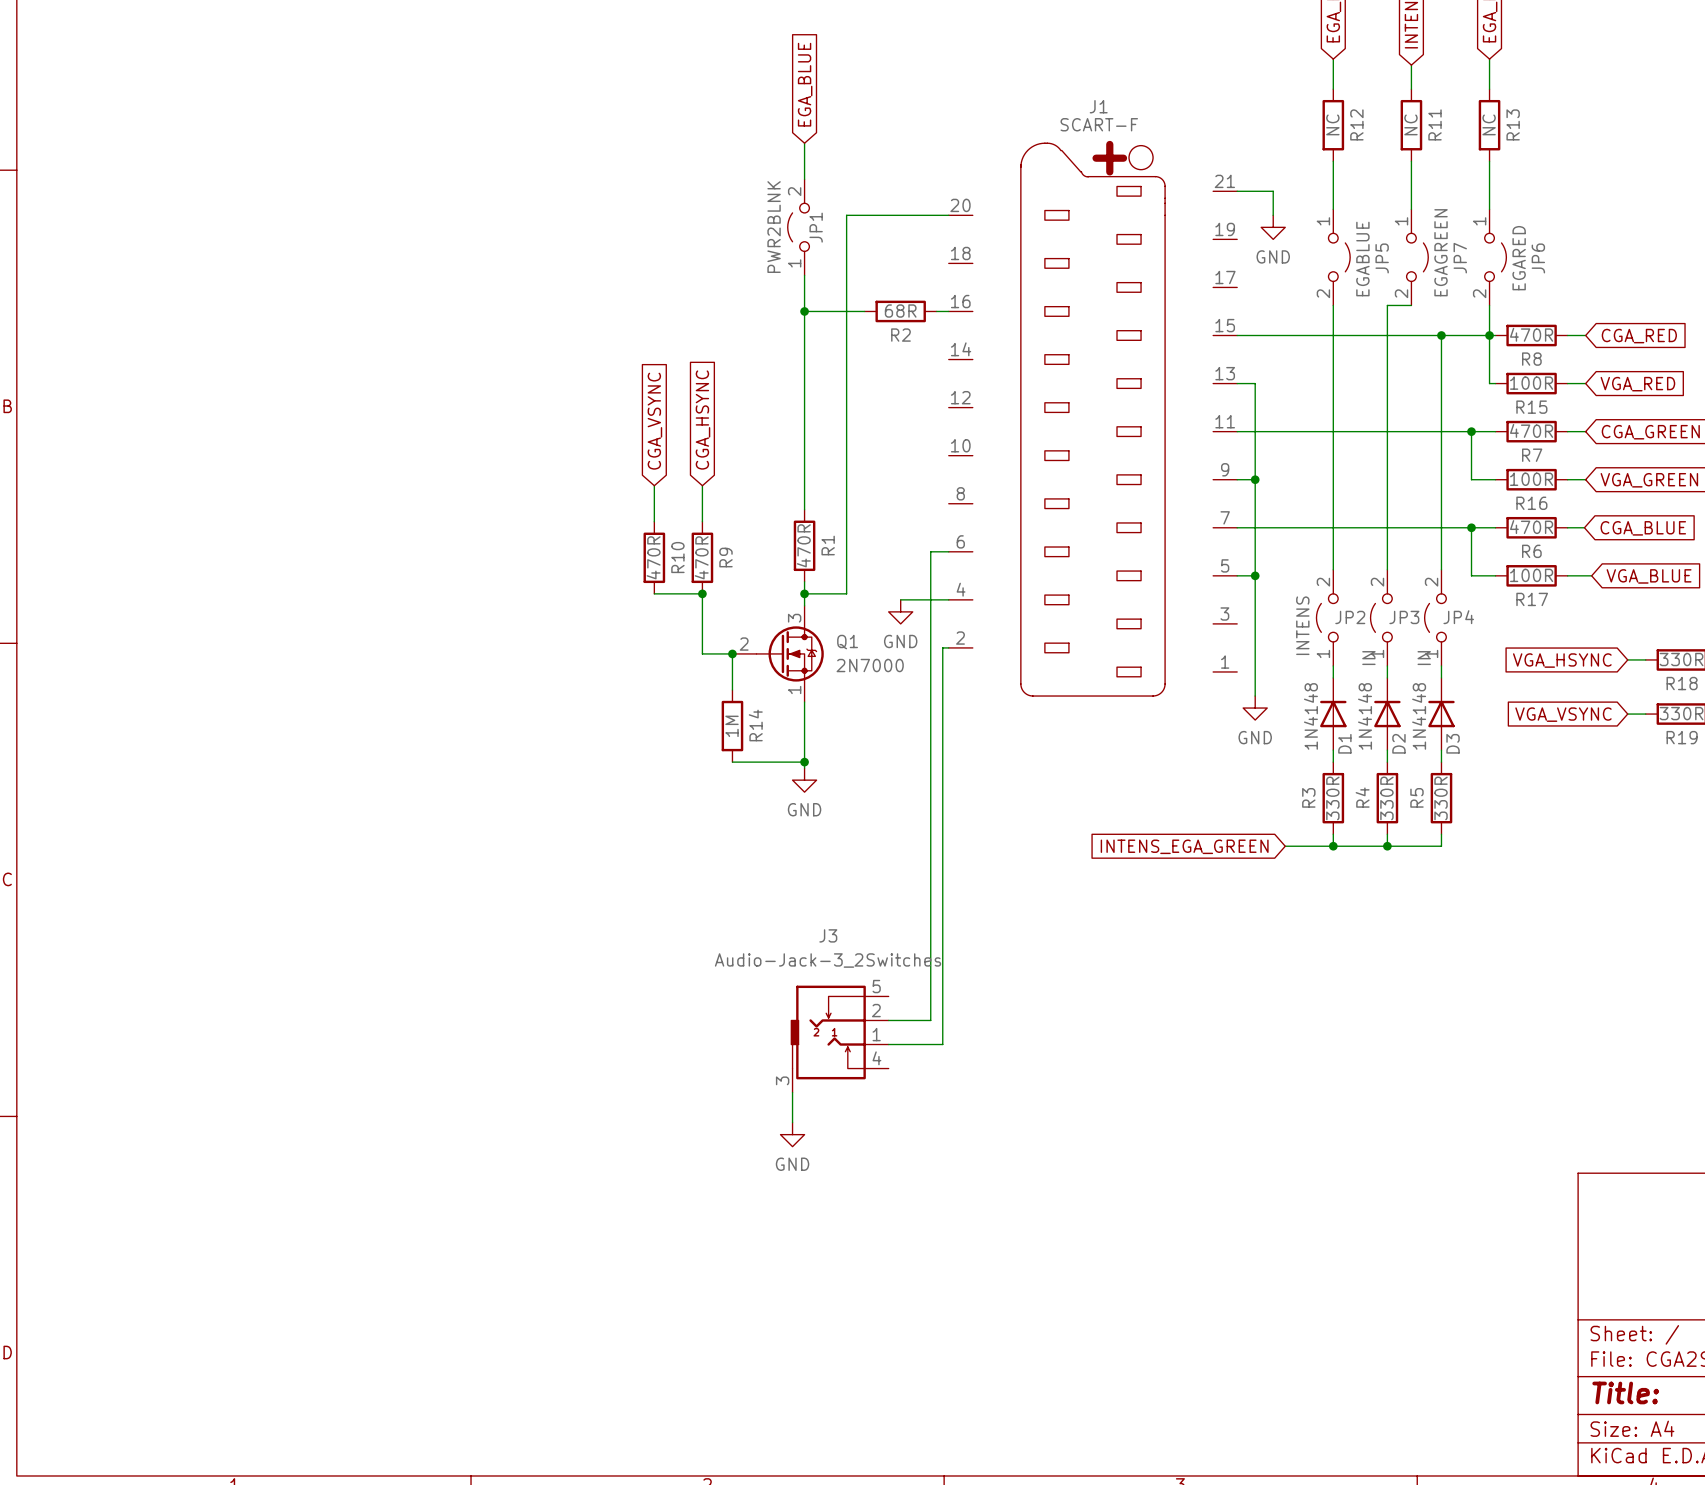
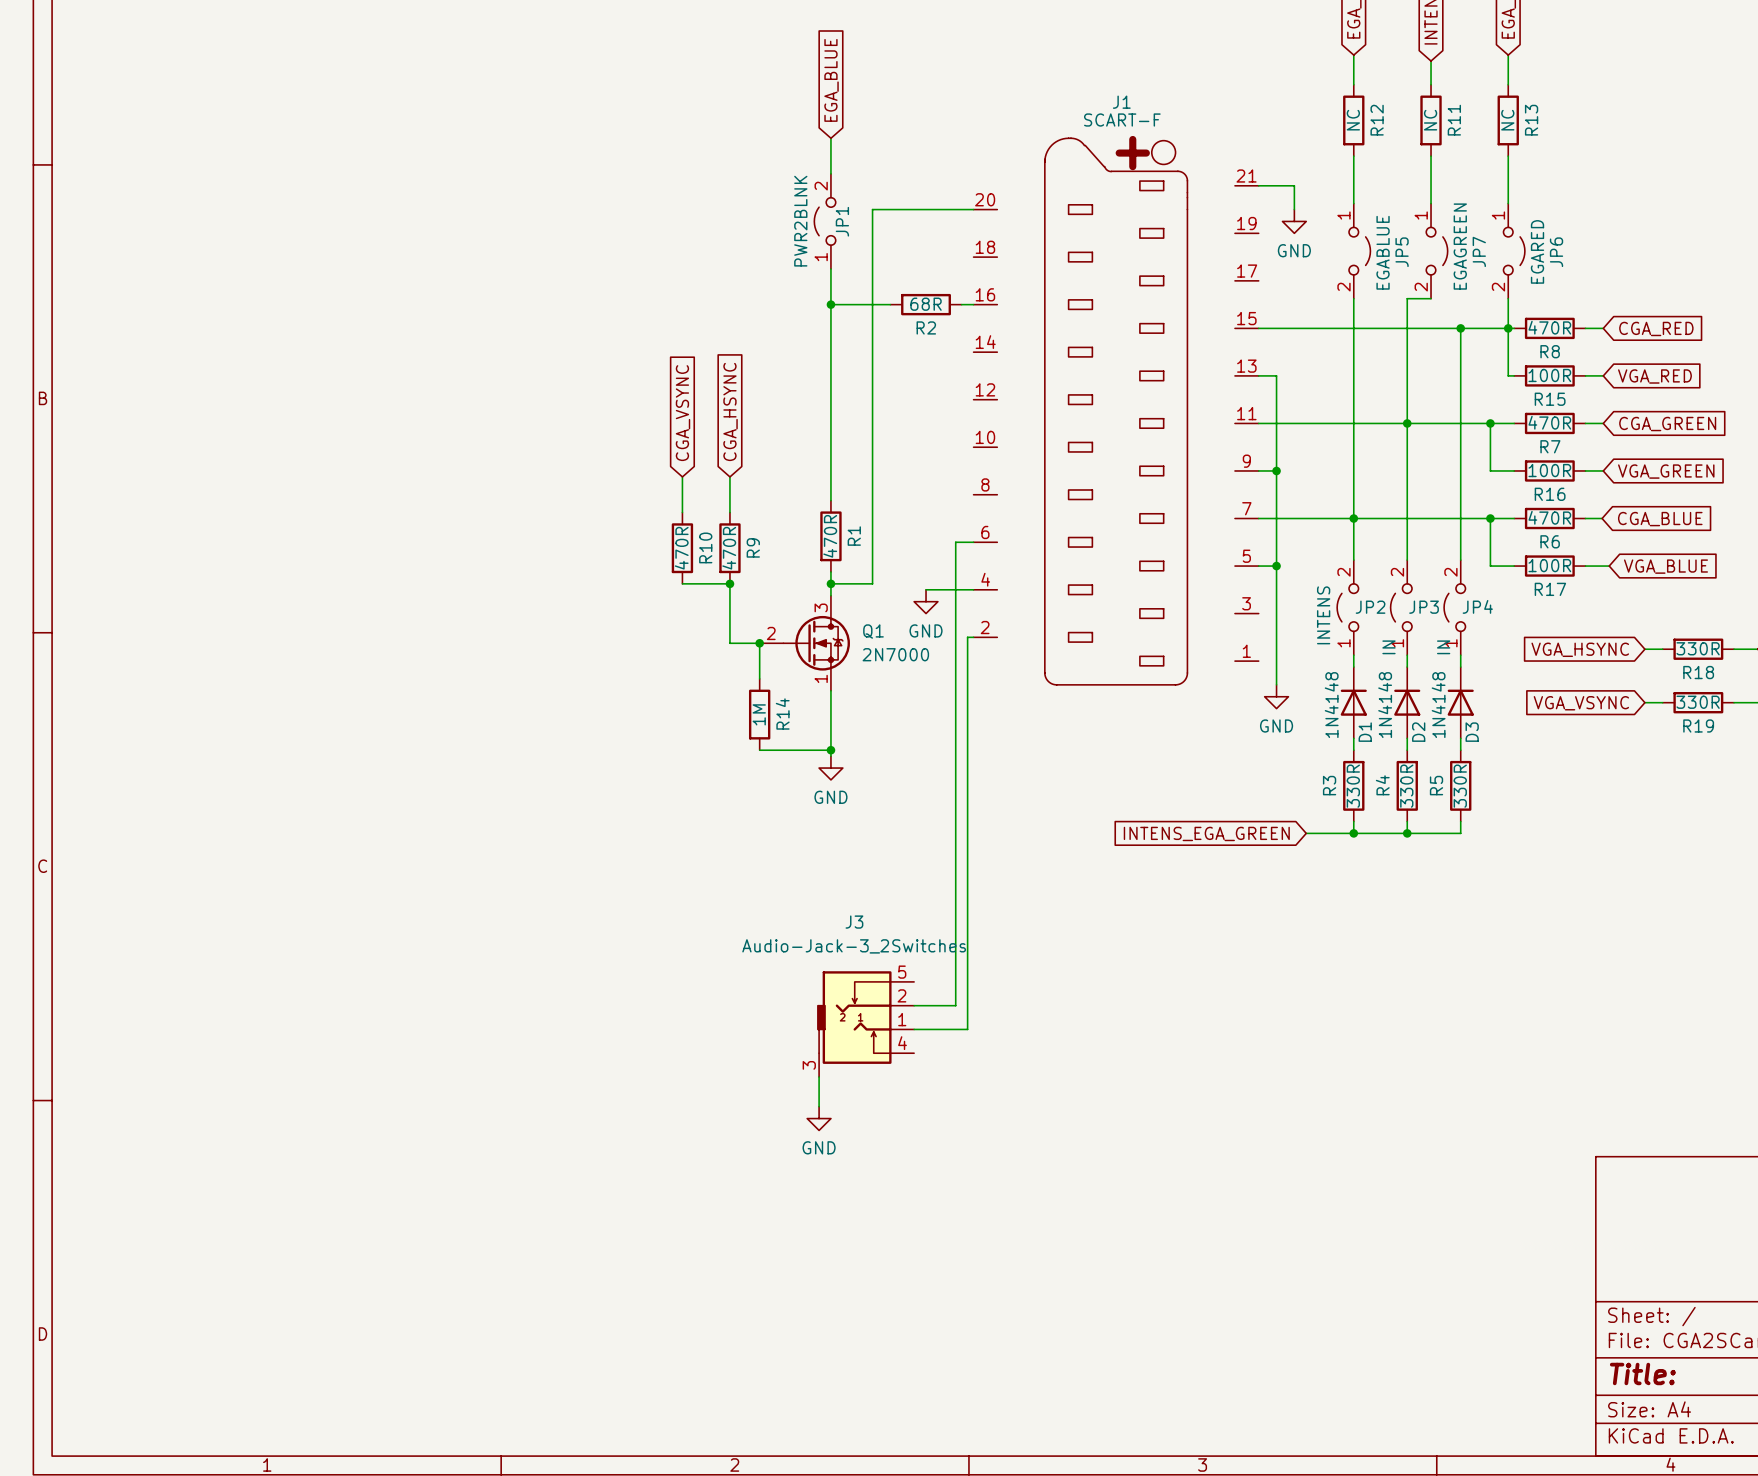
junction: none -> (1407, 423)
junction: none -> (1353, 518)

